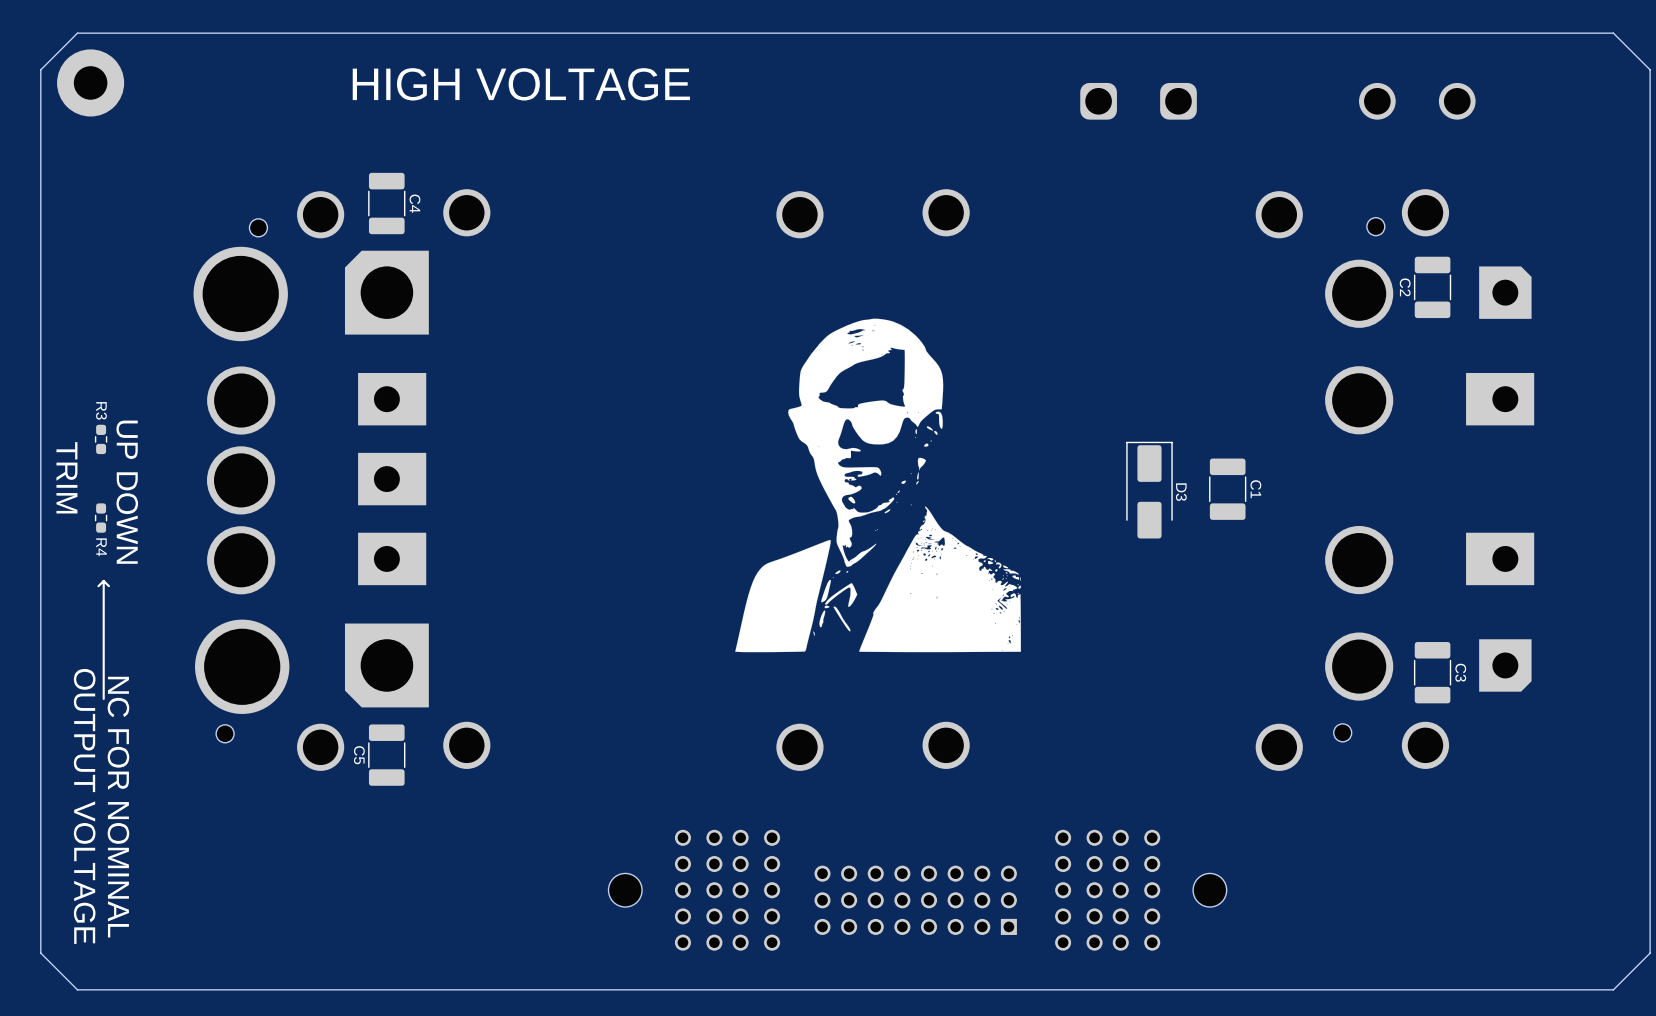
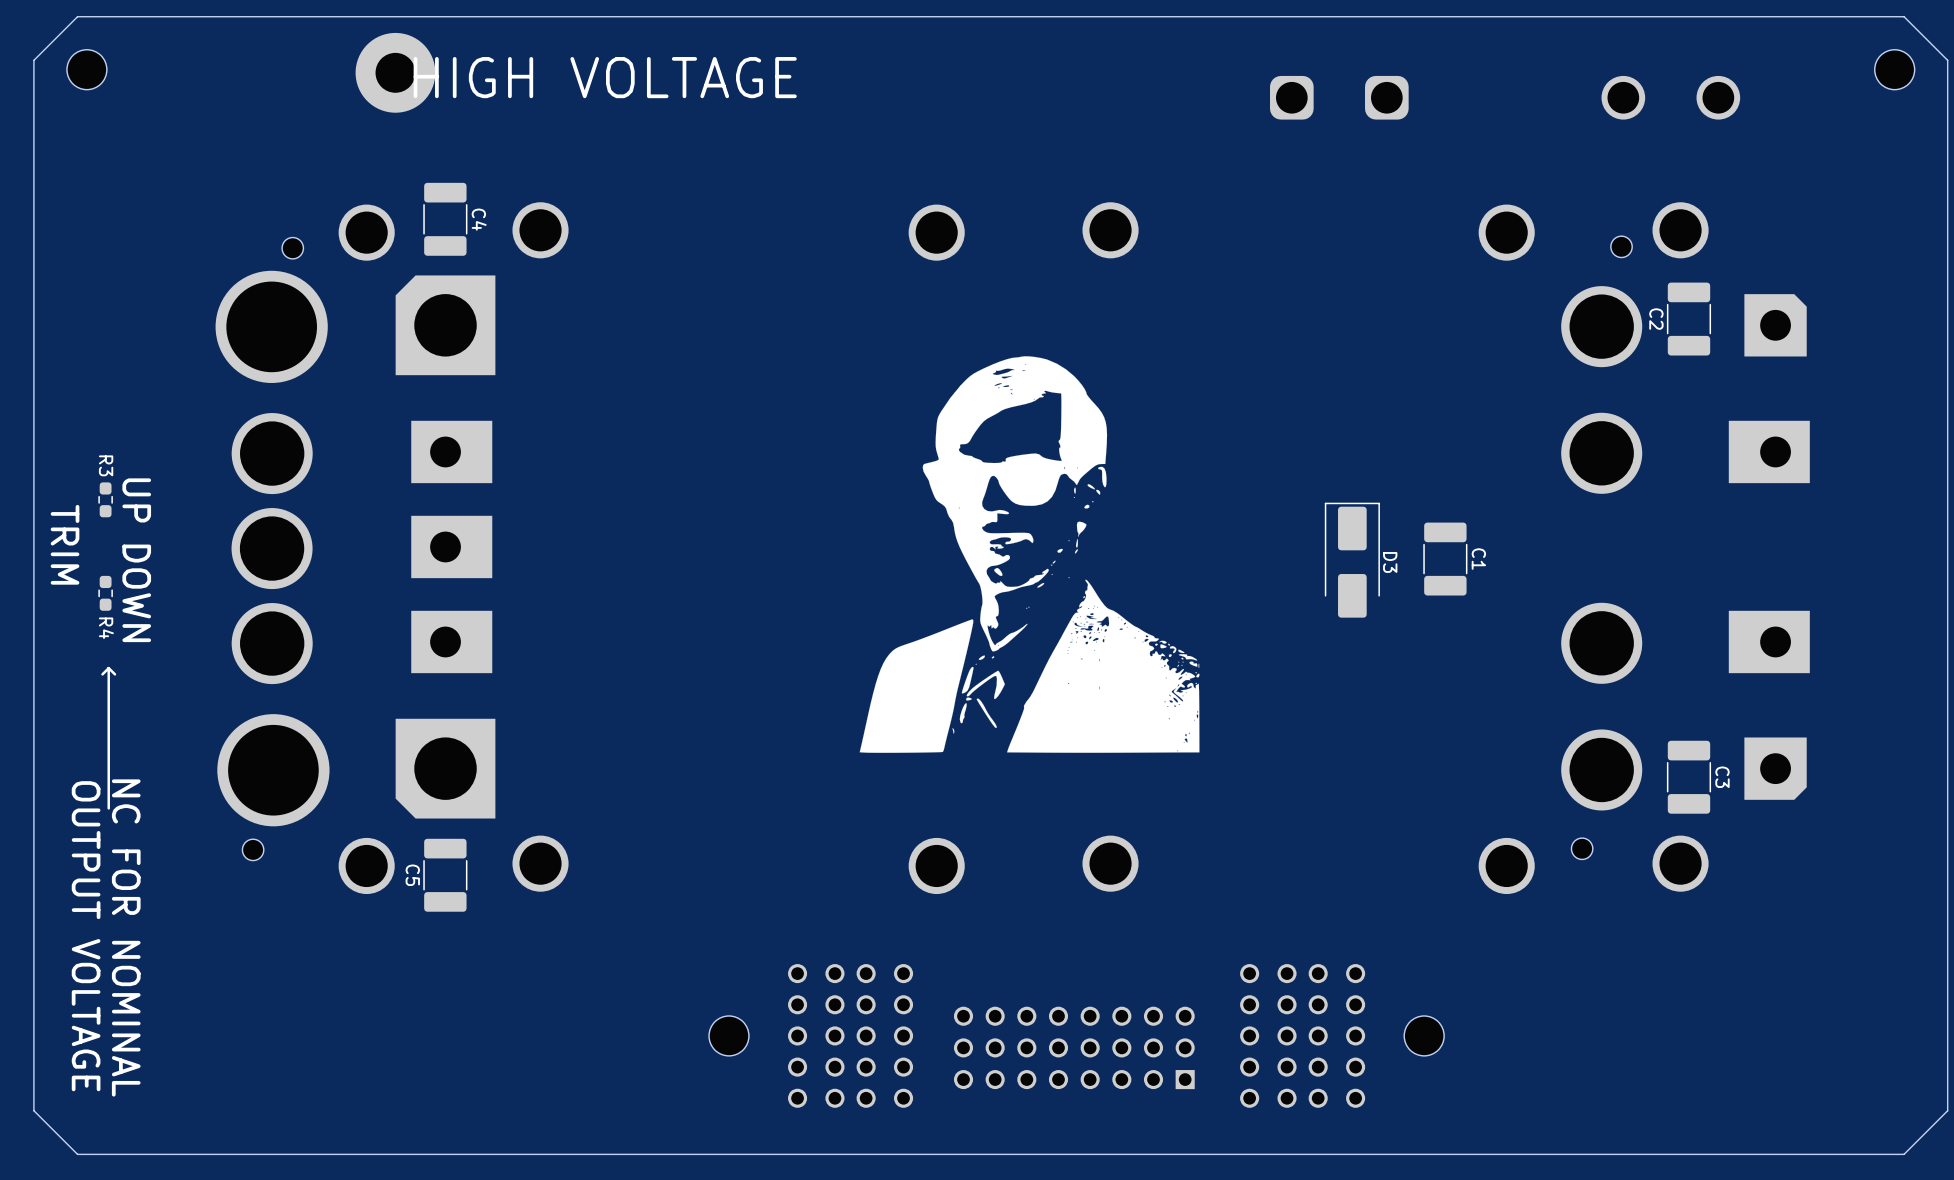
part footprint: [57, 49, 125, 117] -> [66, 49, 107, 90]
part: none -> (1894, 69)
part: none -> (395, 72)

